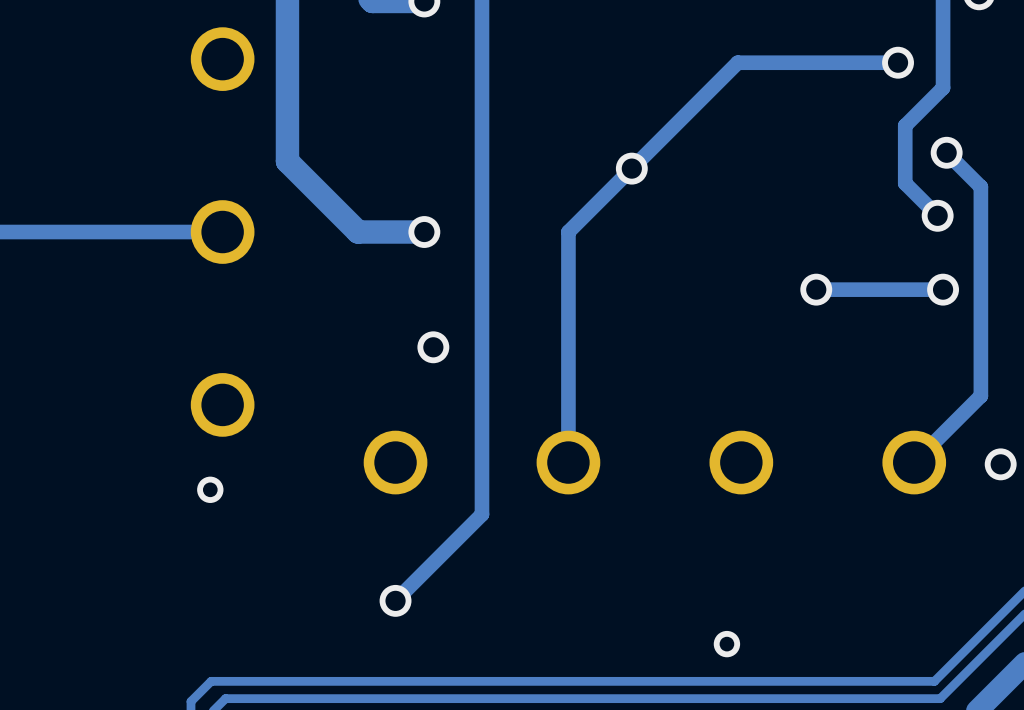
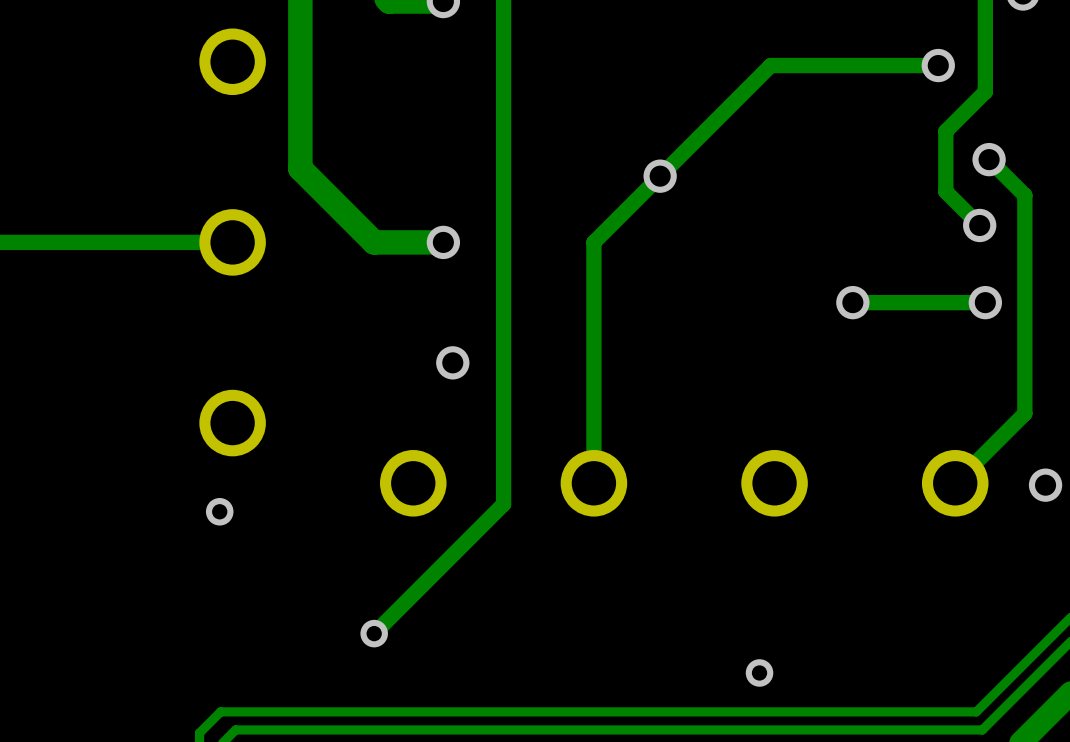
track: (481, 482) (481, 514) (395, 600) -> (503, 504) (374, 633)
via: (395, 600) -> none
via: none -> (374, 633)

